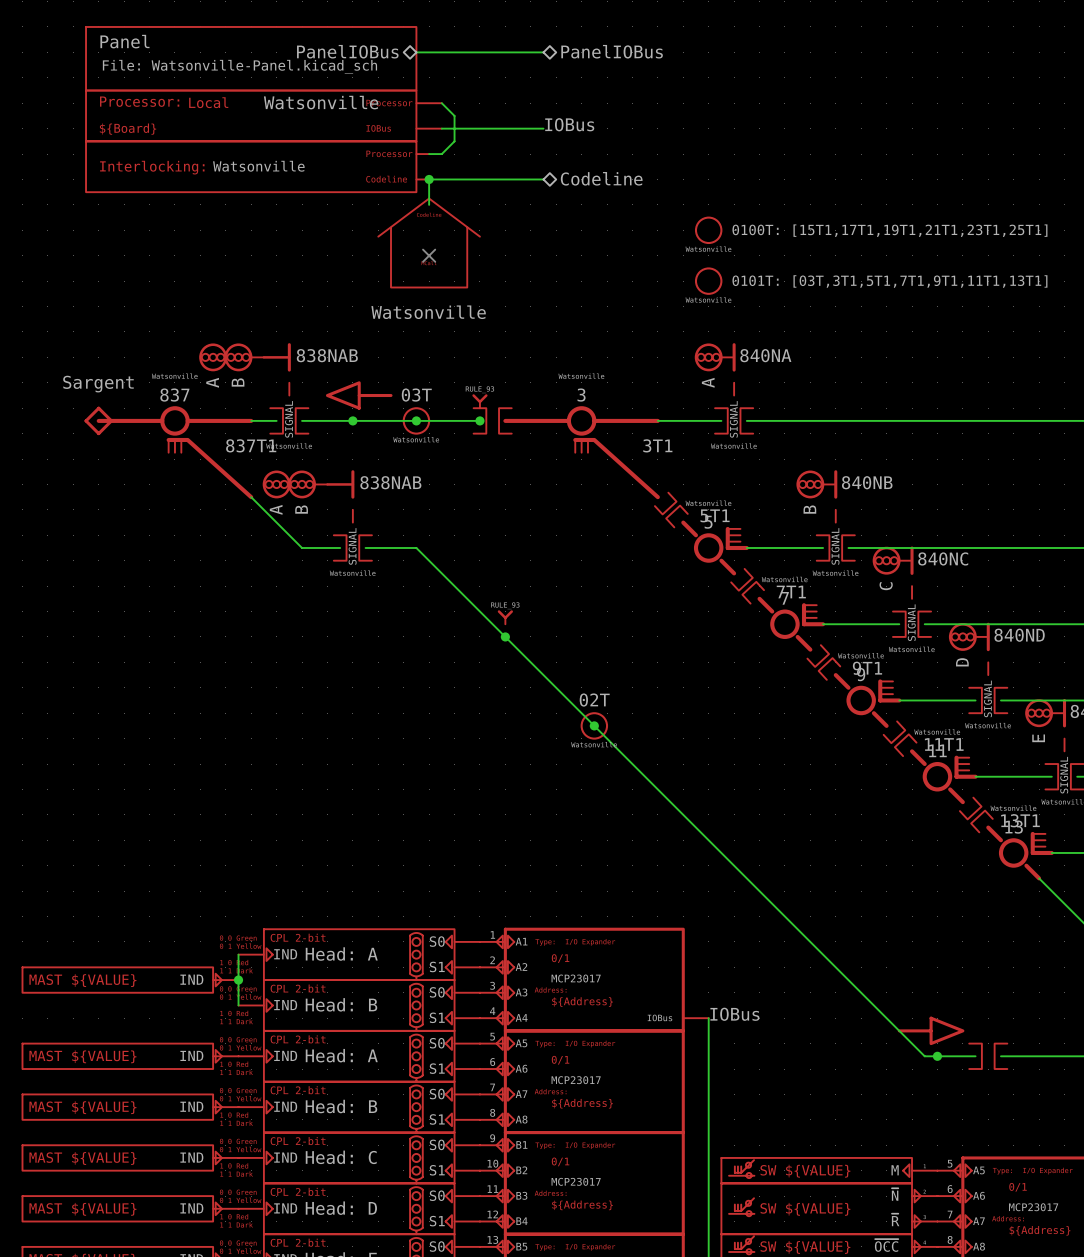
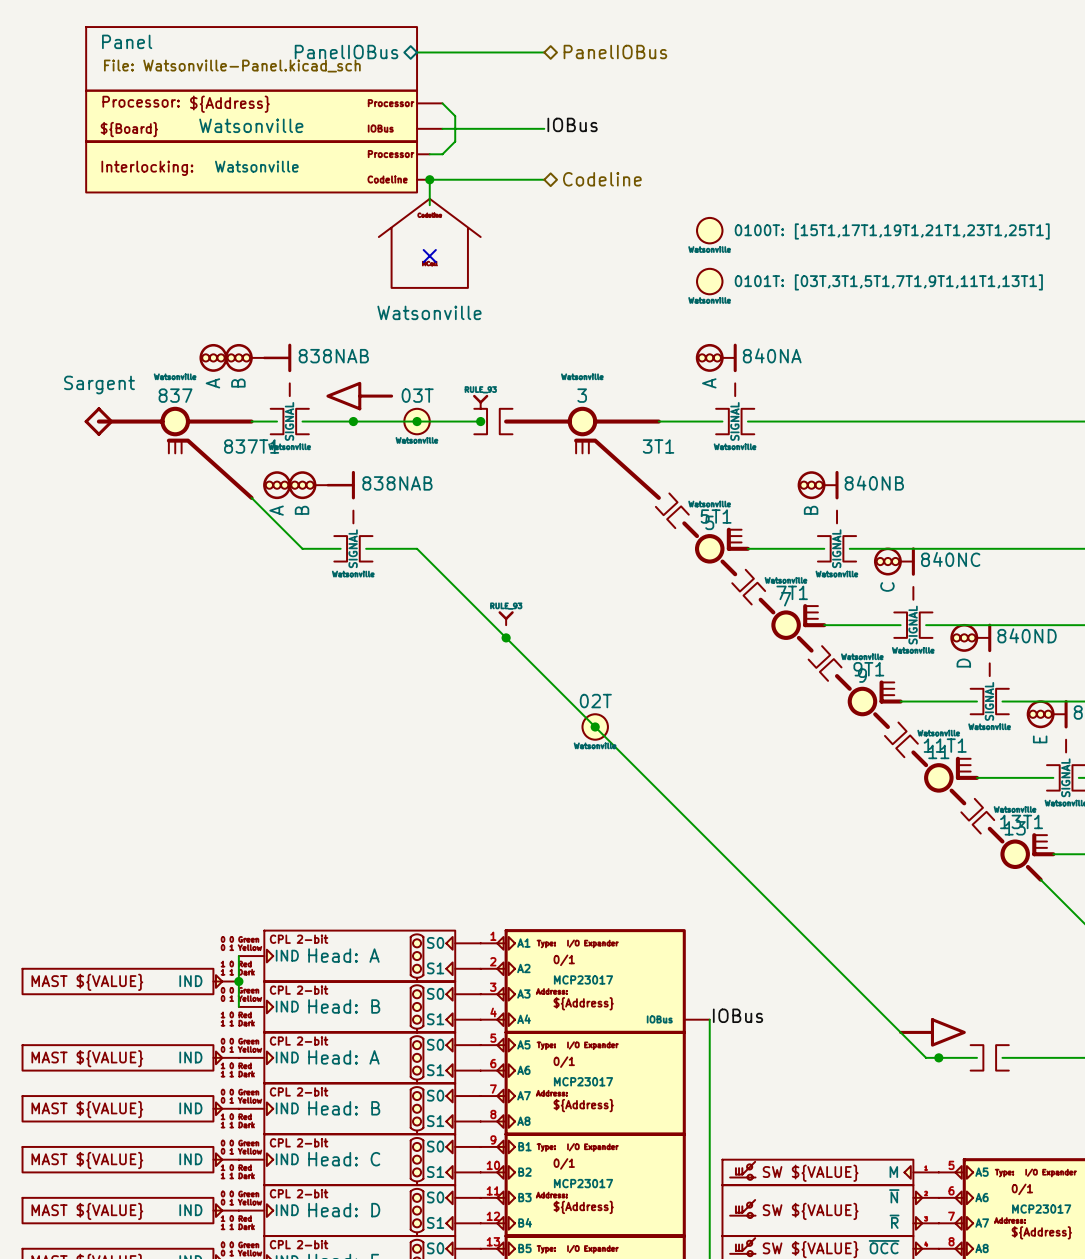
part text: Local (208, 102) -> ${Address} (229, 104)
part value position: Watsonville (321, 102) -> Watsonville (251, 125)

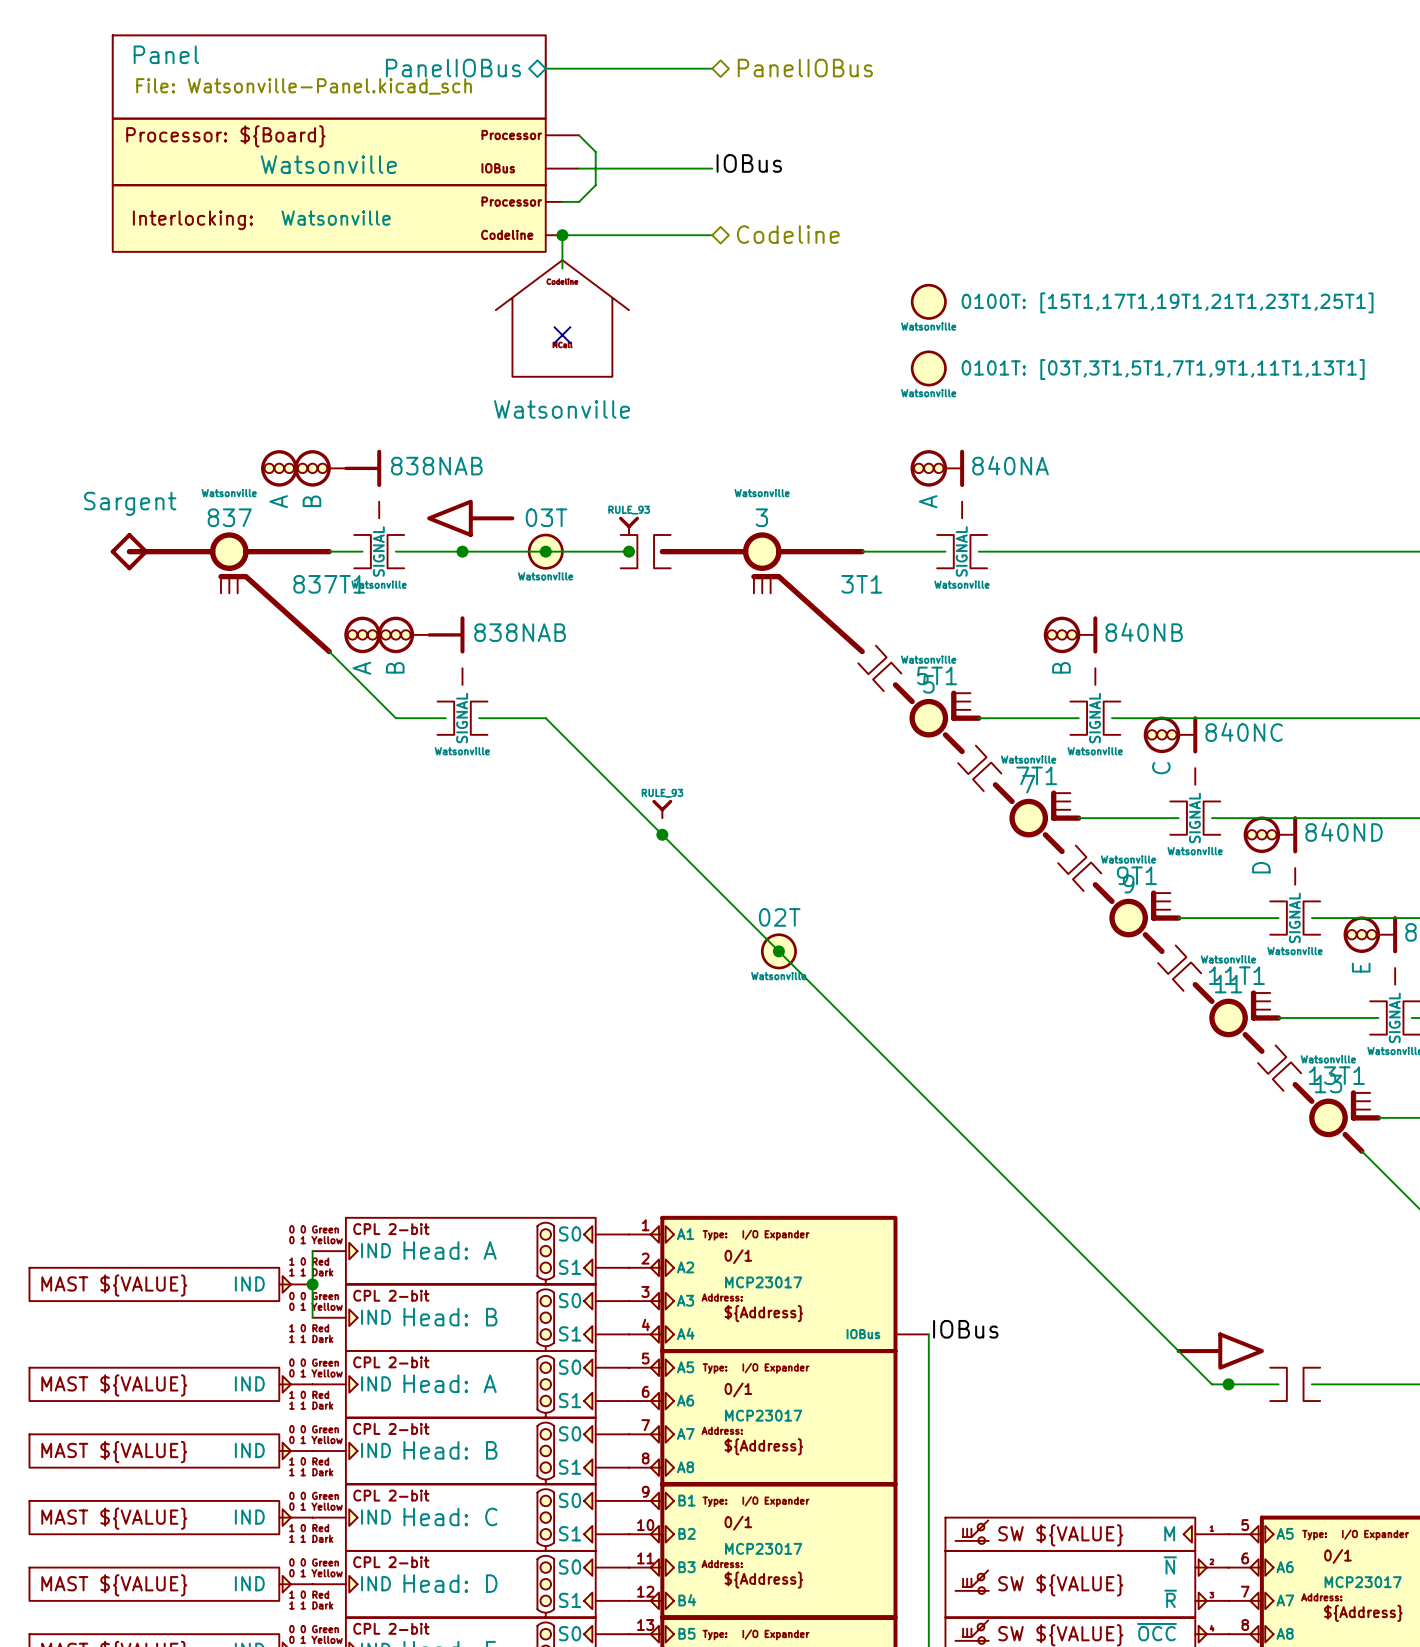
part text: Processor: (141, 101) -> none
part text: none -> Processor: ${Board} (225, 136)
part text: ${Address} (229, 104) -> none
part text: ${Board} (129, 129) -> none

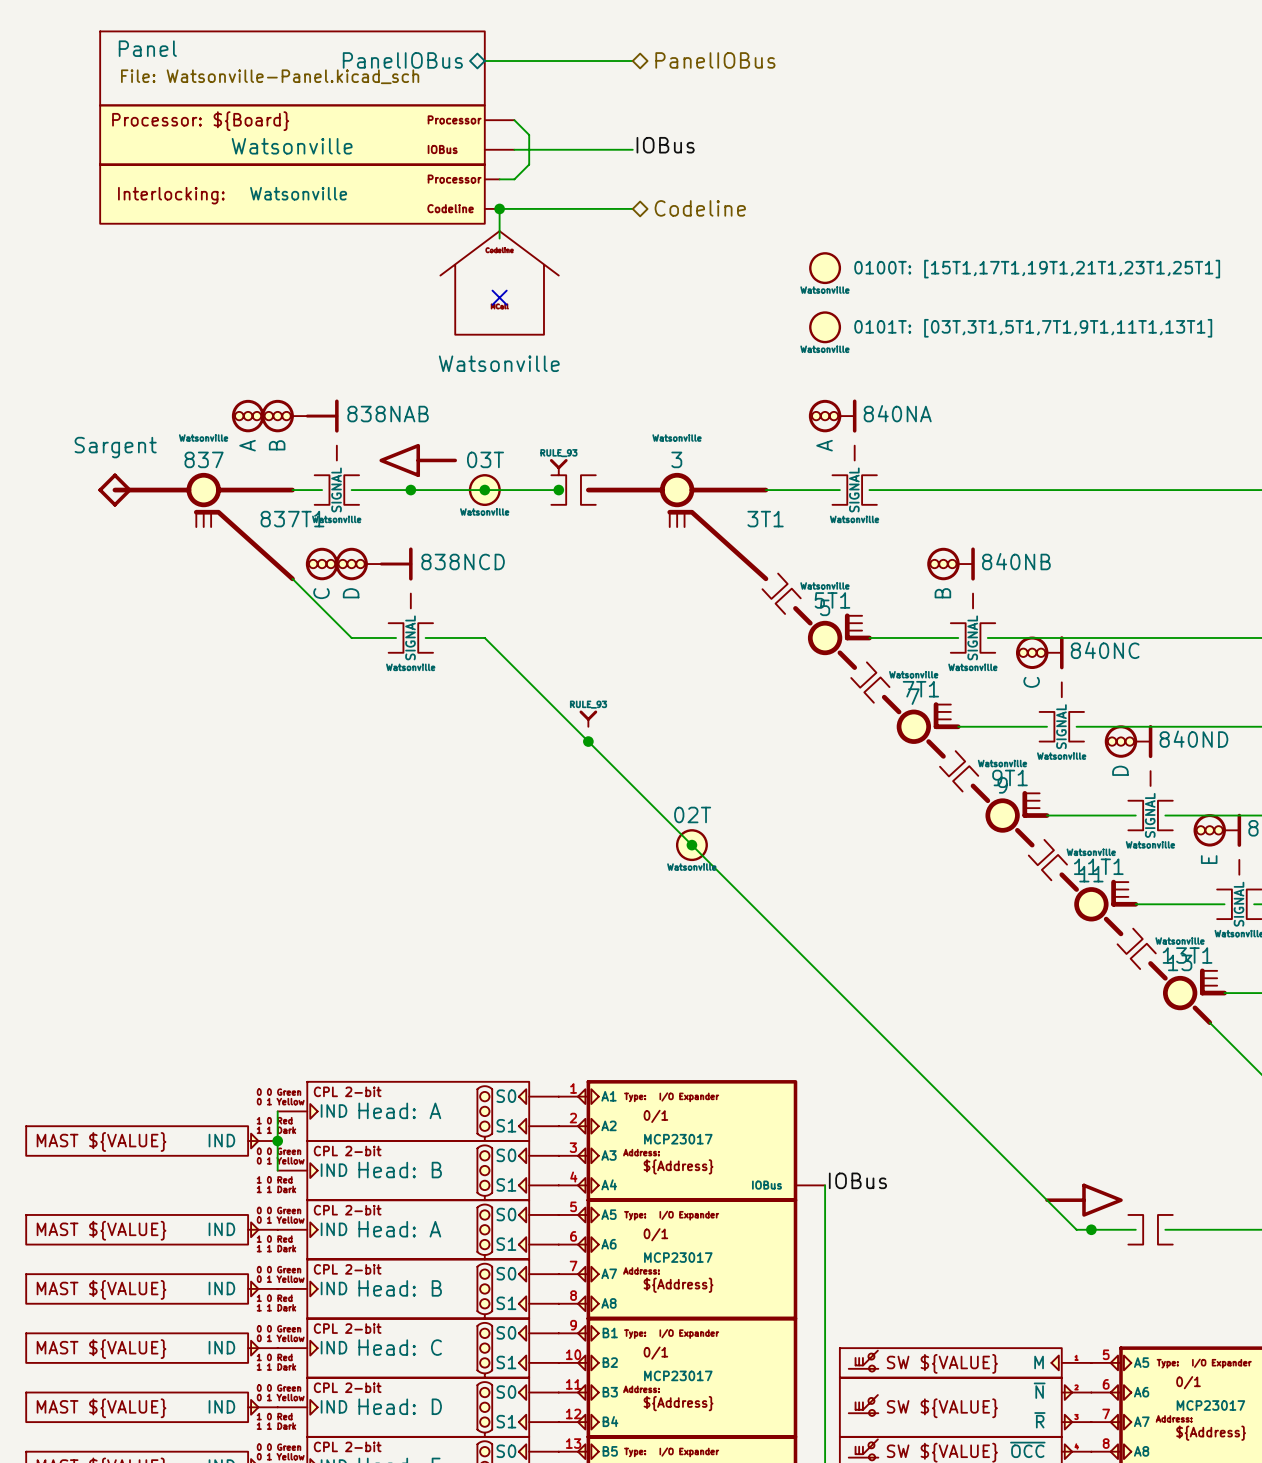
part value: 838NAB (520, 632) -> 838NCD (463, 561)
part value: B (395, 667) -> D (351, 593)
part value: A (361, 668) -> C (321, 593)

